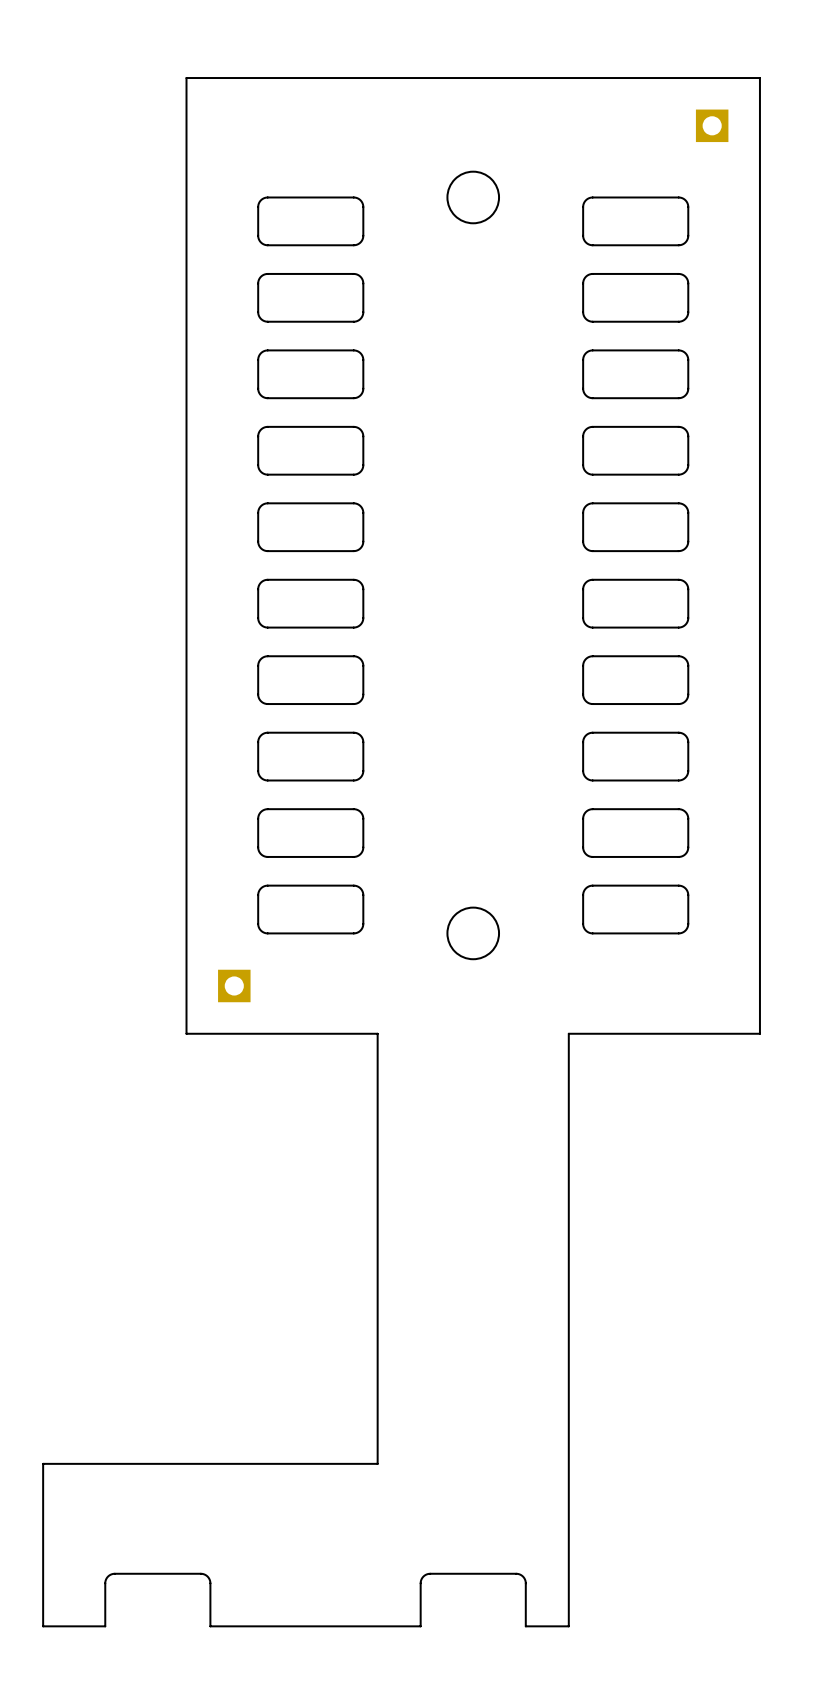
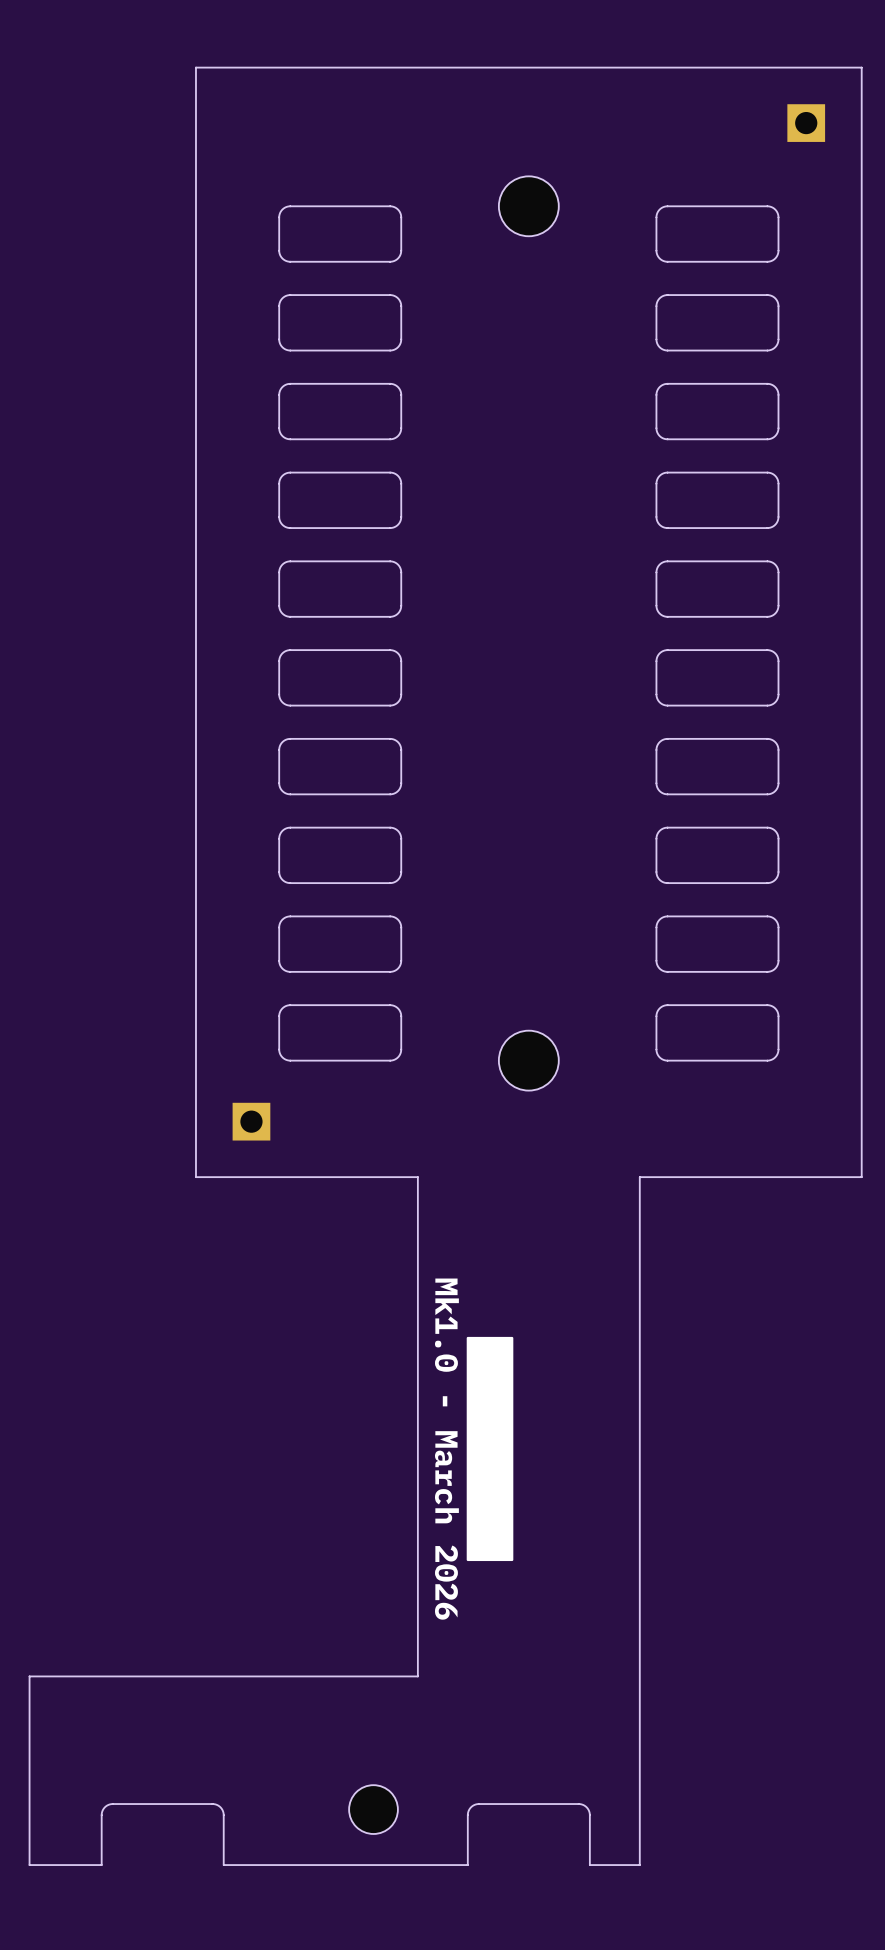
drawing: none -> [466, 1336, 514, 1562]
text: none -> Mk1.0 - March 2026 (446, 1449)
part: none -> (373, 1809)

